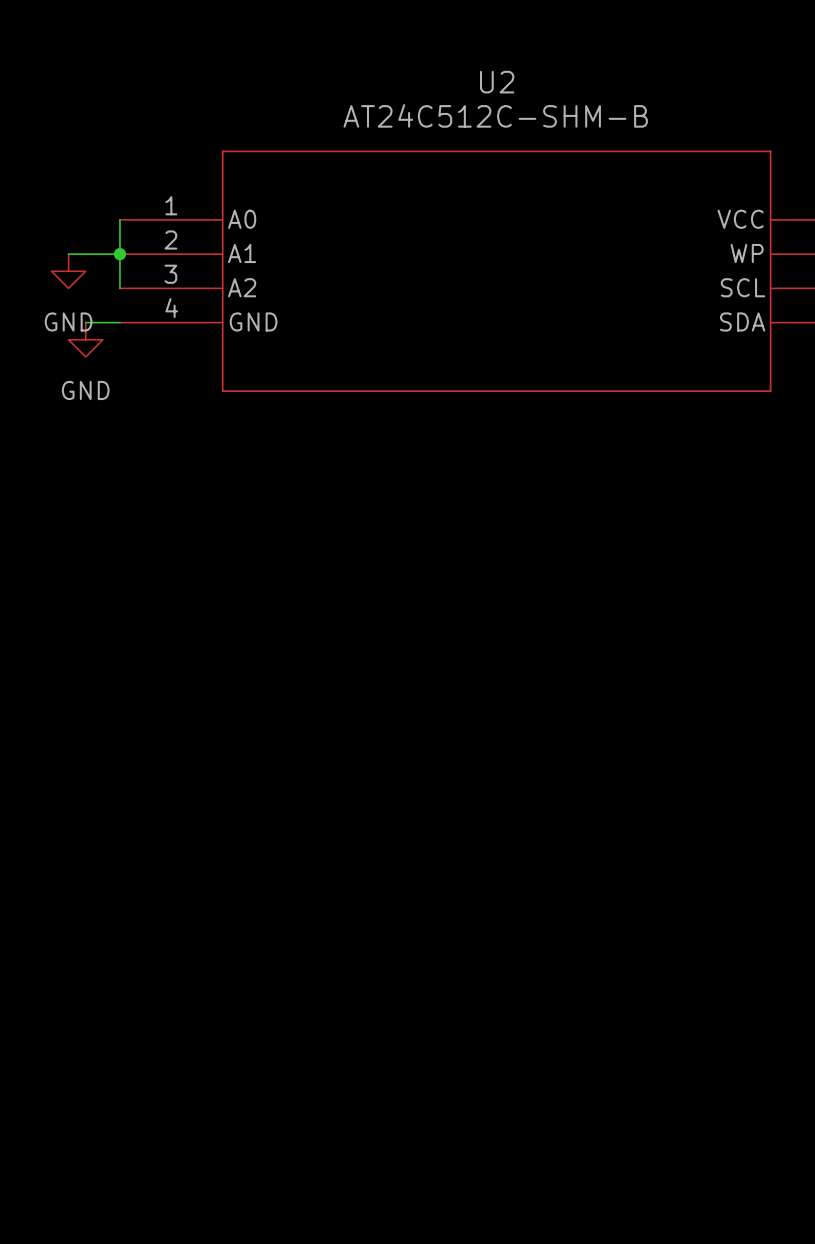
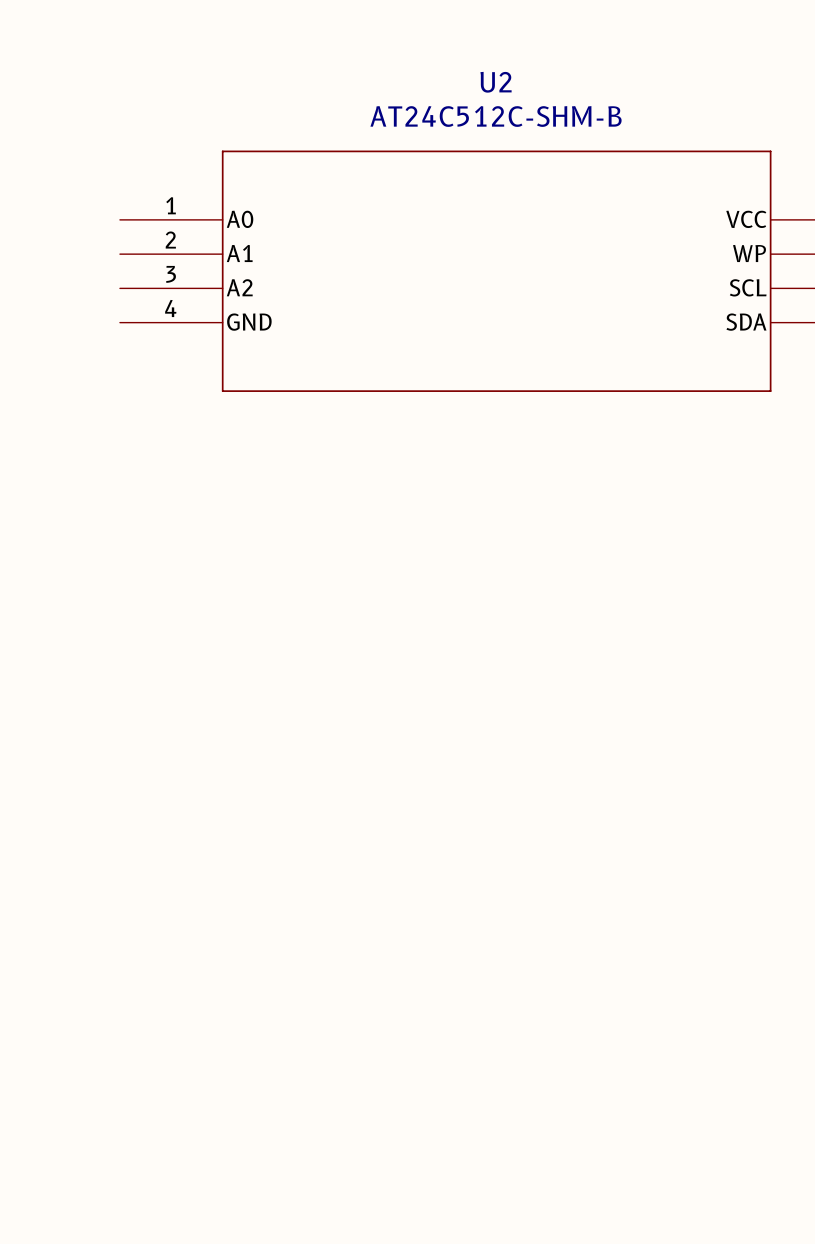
wire: (119, 219) (119, 288) -> none
wire: (68, 254) (119, 254) -> none
junction: (119, 254) -> none
power symbol: GND (68, 271) -> none
wire: (85, 322) (119, 322) -> none
power symbol: GND (85, 339) -> none

